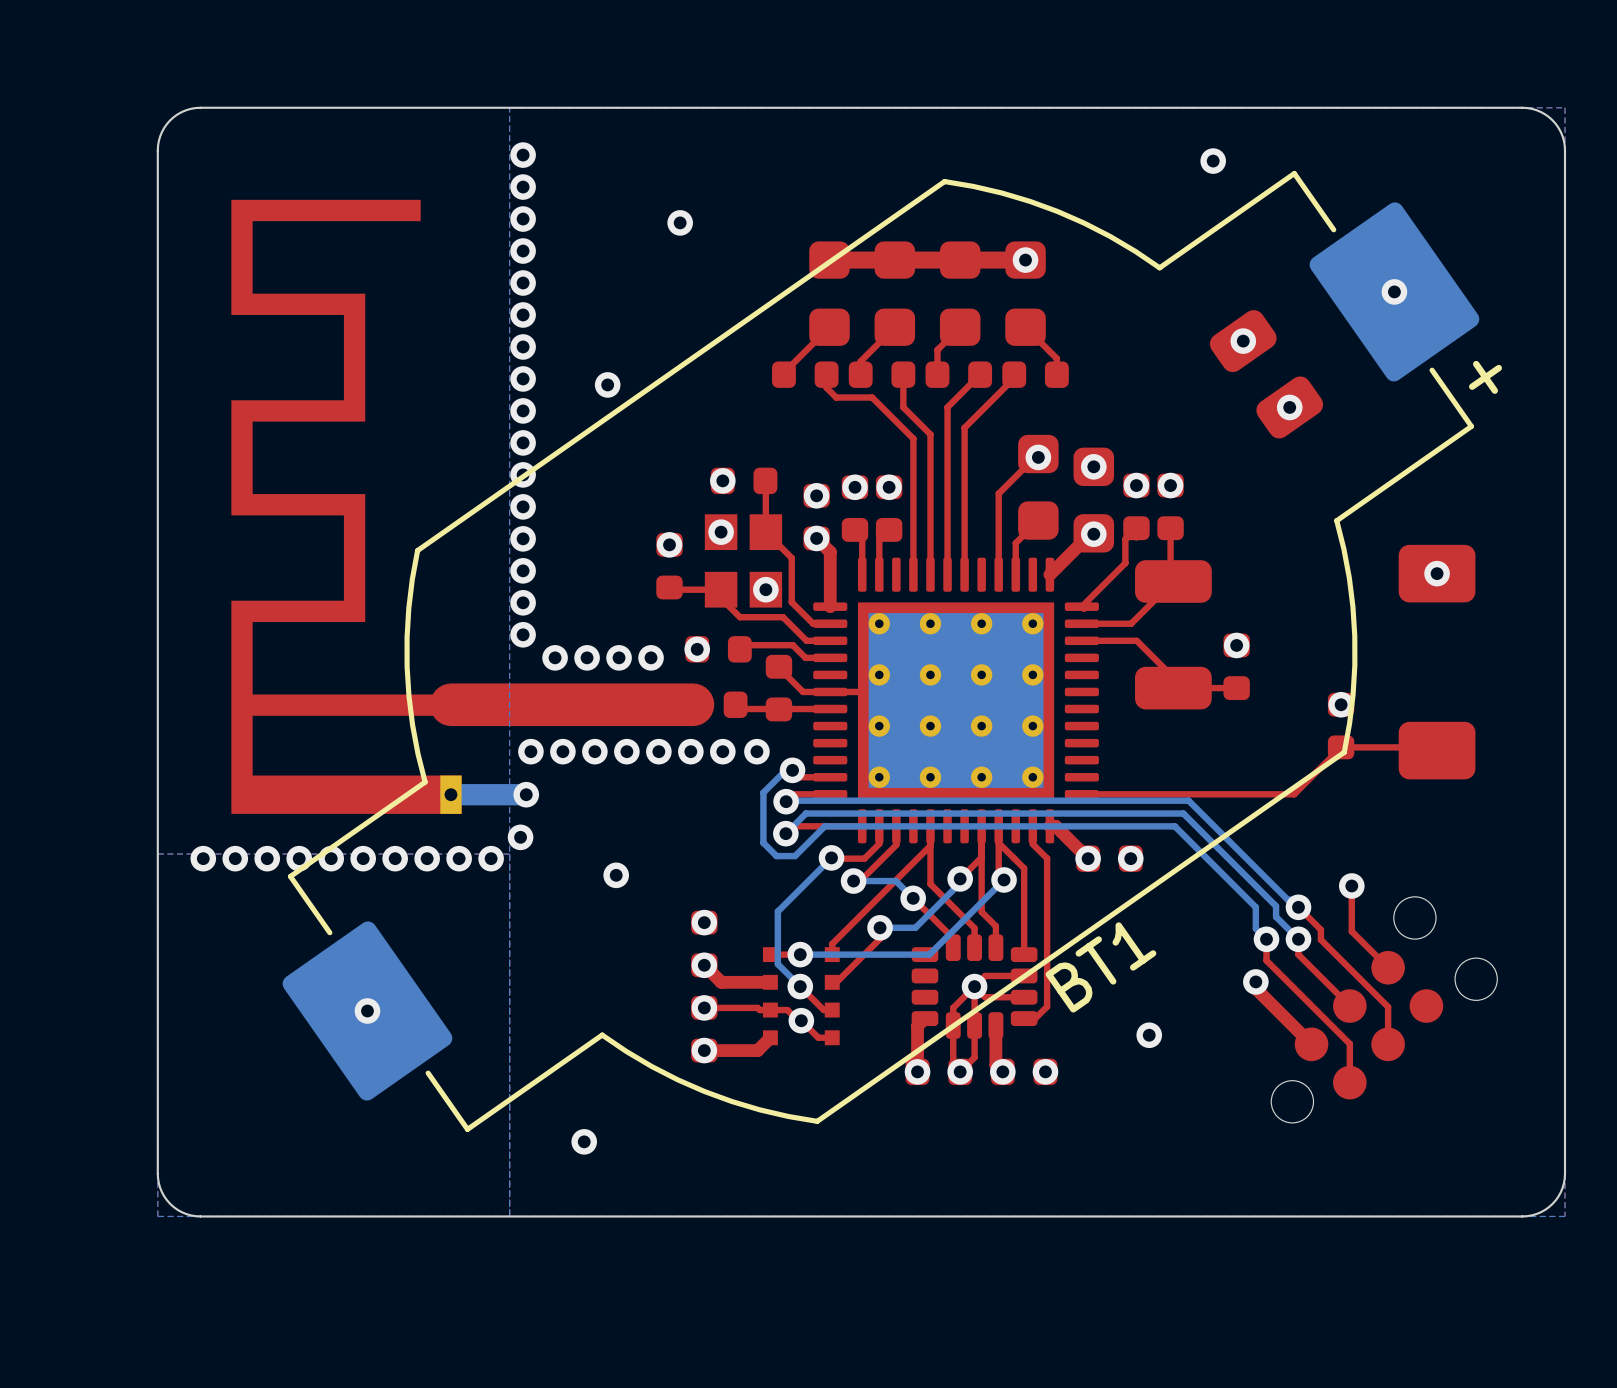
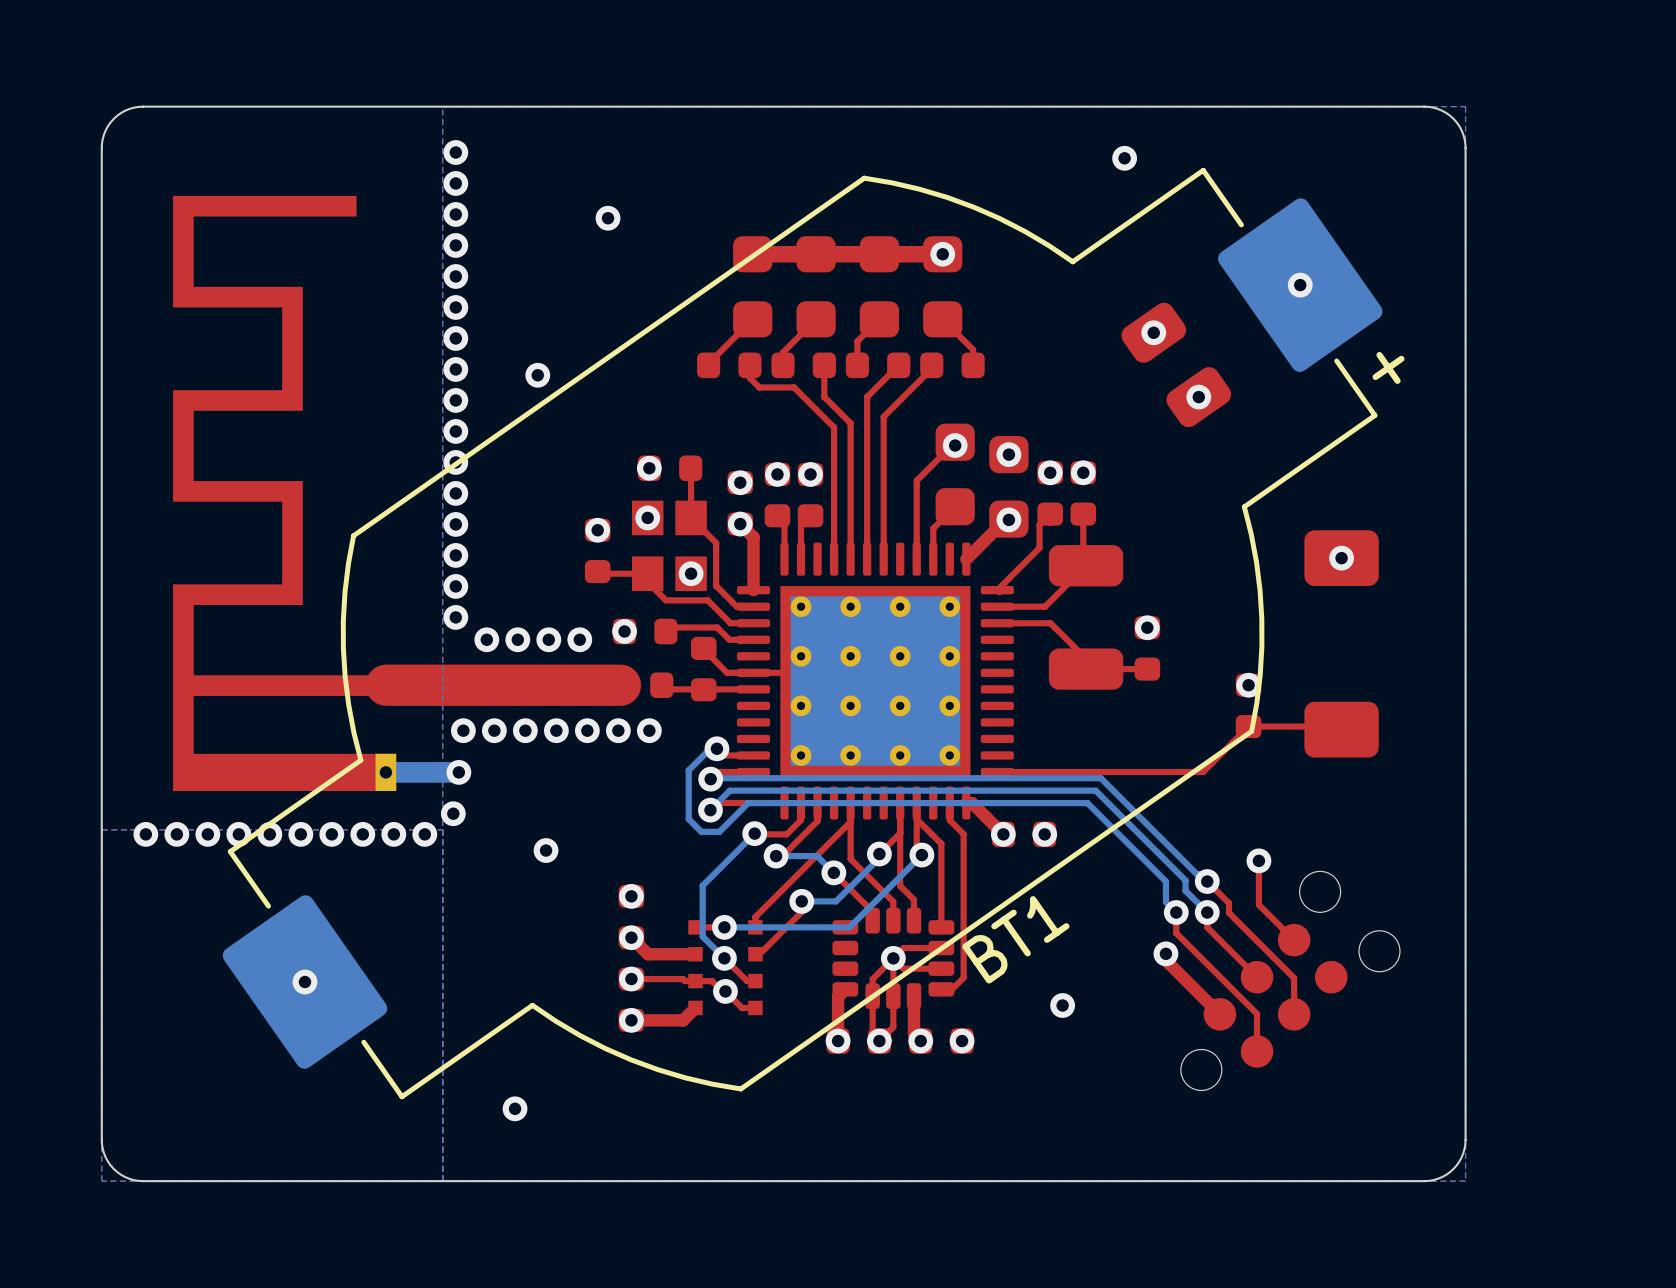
via: (756, 751) -> none

